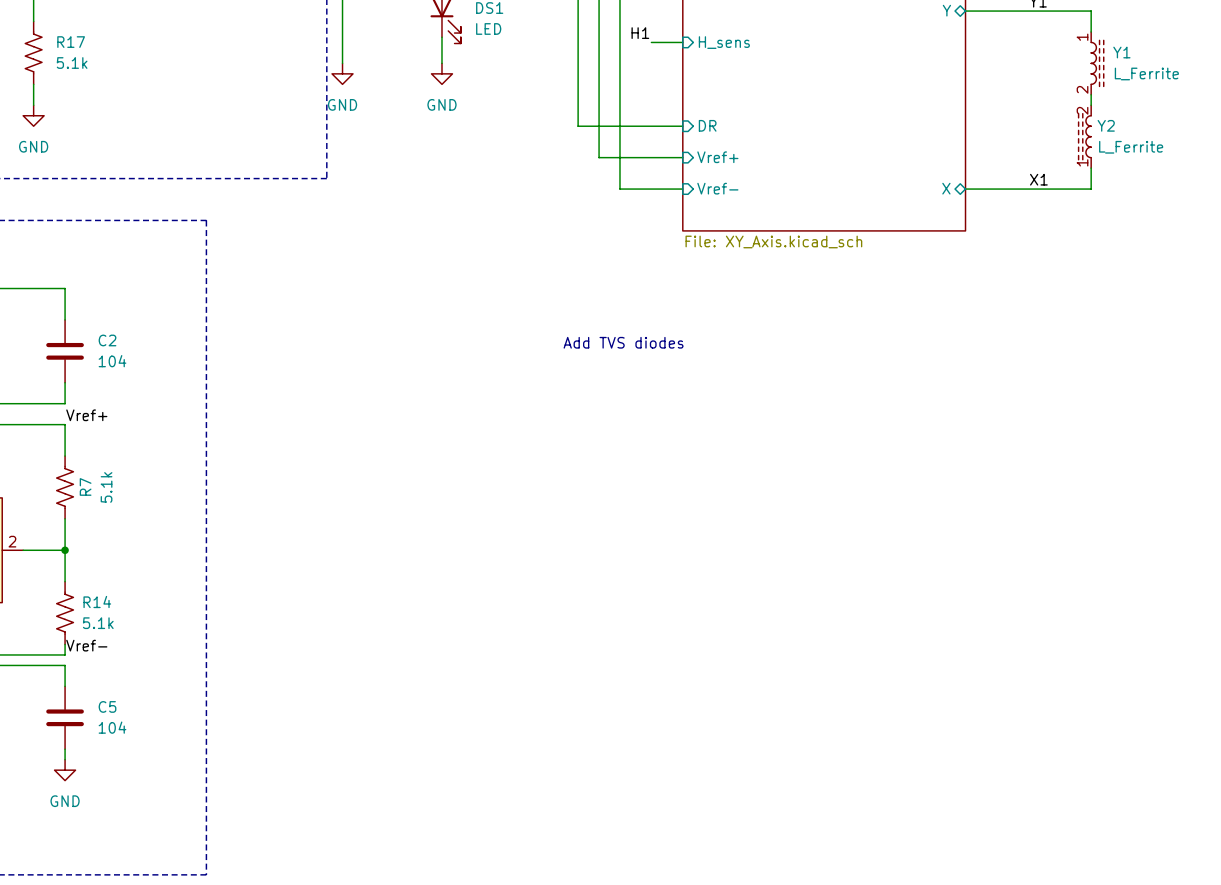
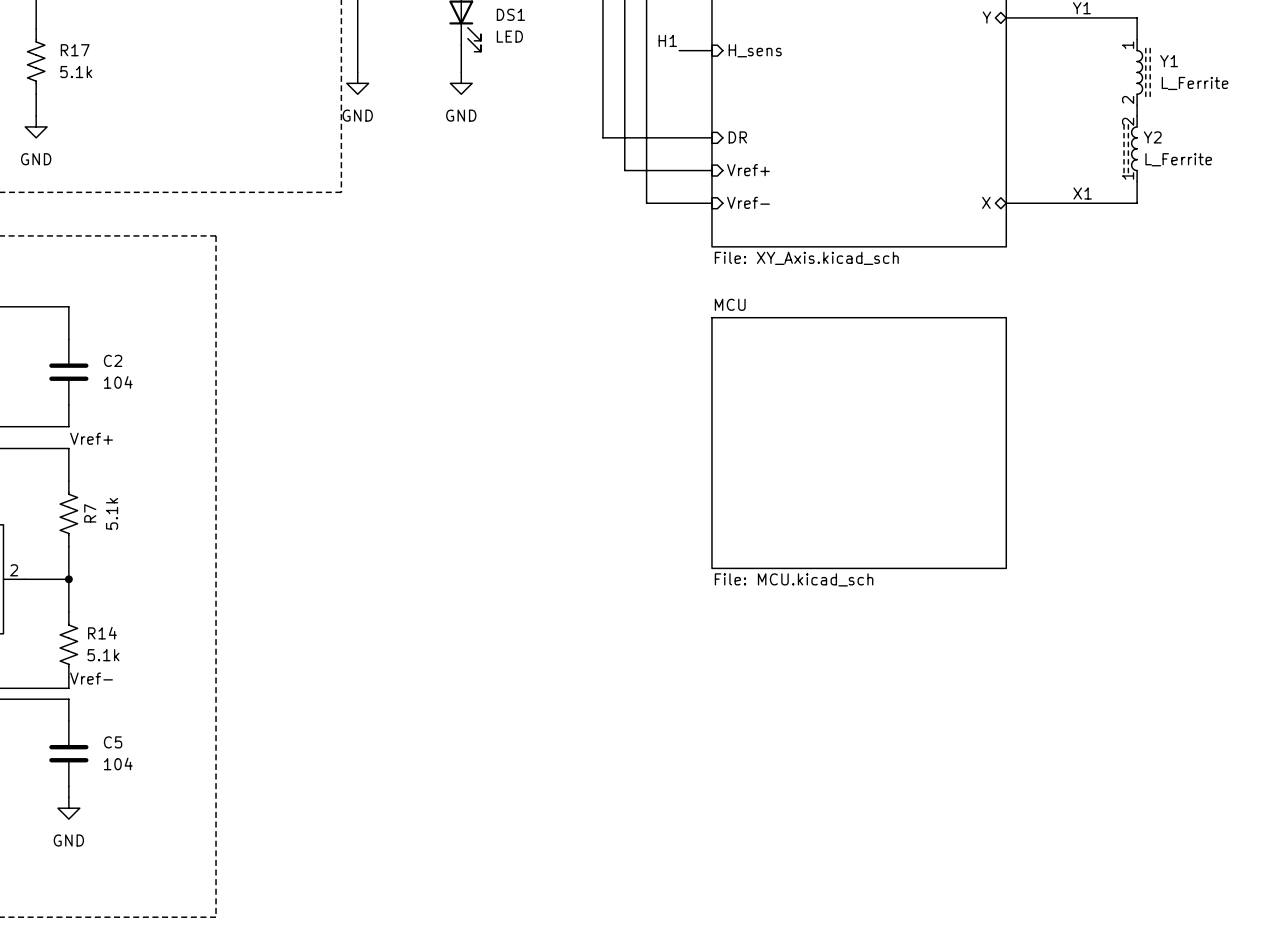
text: Add TVS diodes (623, 342) -> none
sheet MCU: none -> File: MCU.kicad_sch (859, 443)

